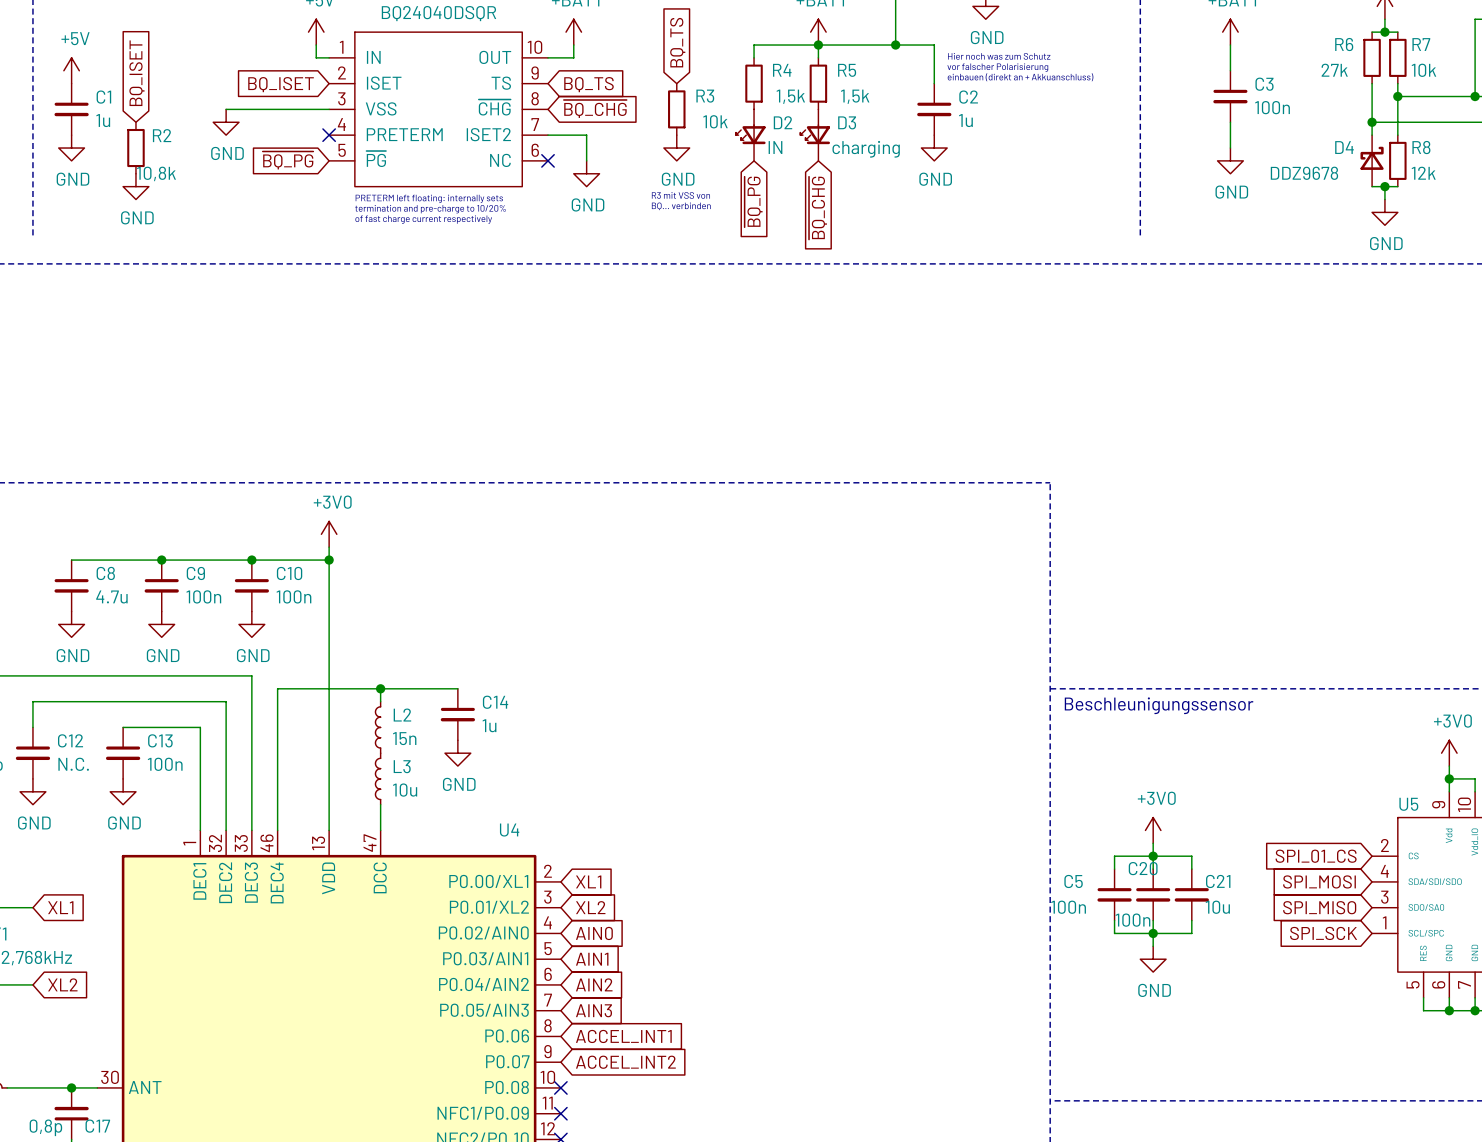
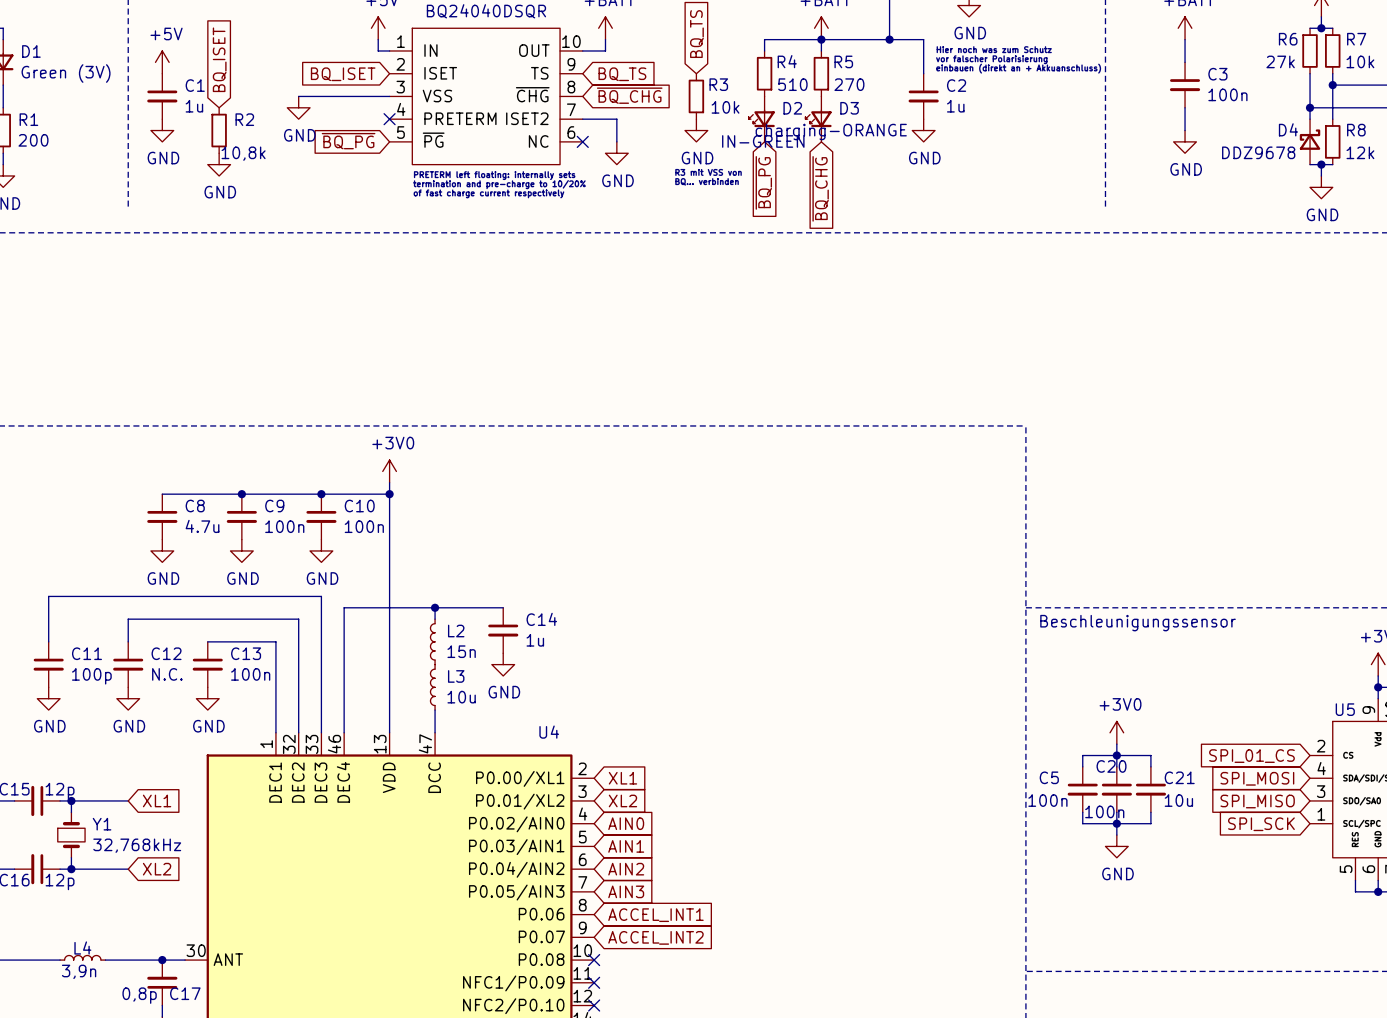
R4 value: 1,5k (790, 96) -> 510 (792, 84)
R5 value: 1,5k (855, 96) -> 270 (849, 84)
D2 value: IN (775, 147) -> IN-GREEN (763, 141)
D3 value: charging (866, 149) -> charging-ORANGE (831, 132)

